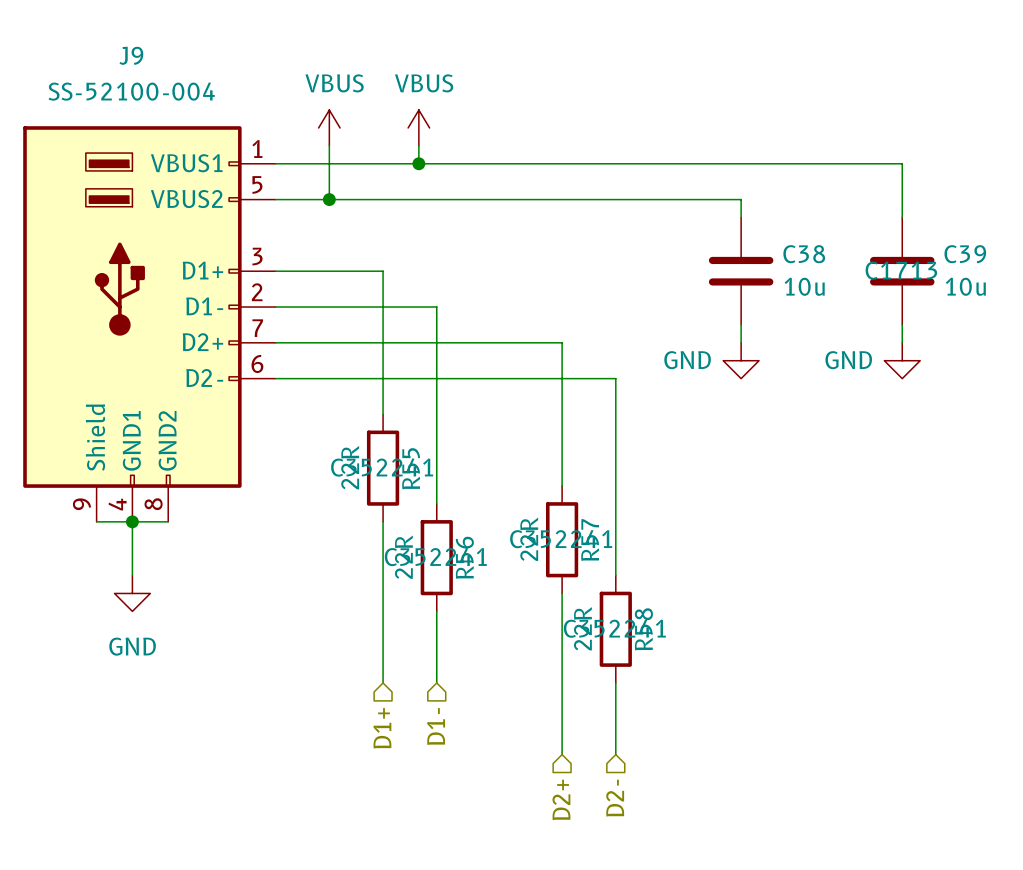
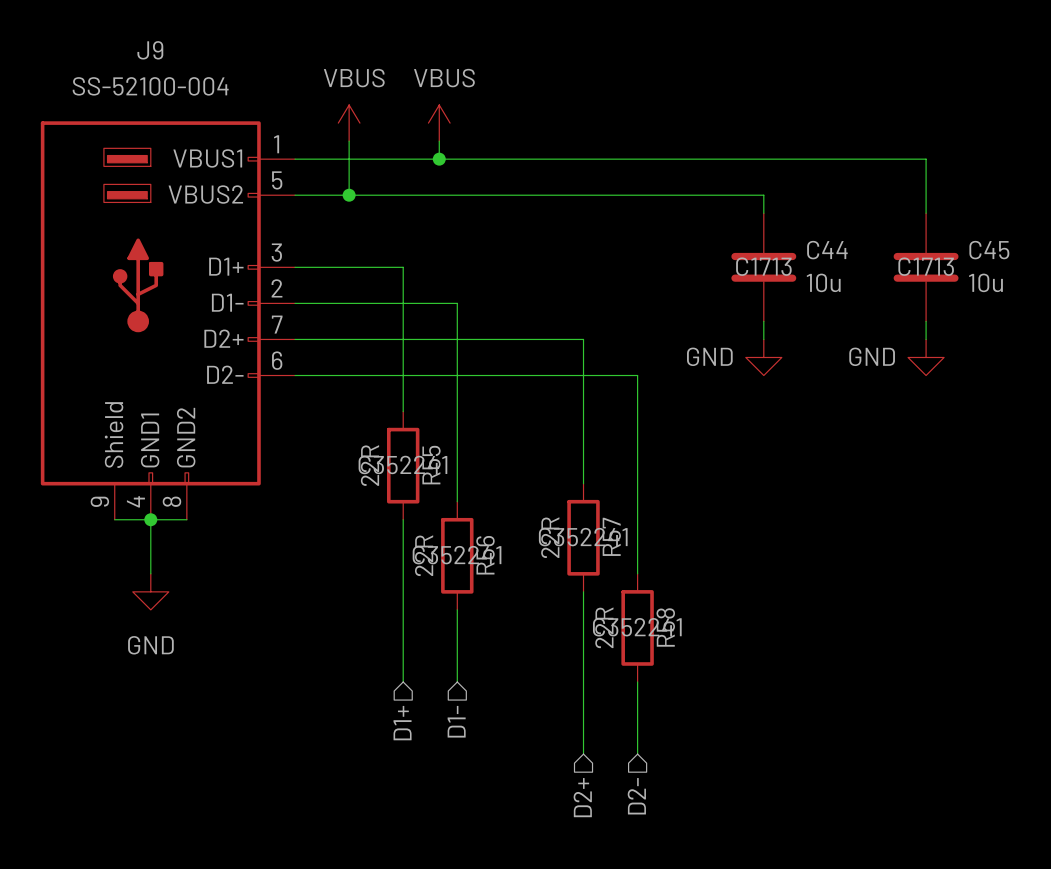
C38 name: C38 (804, 254) -> C44 (827, 250)
C39 name: C39 (965, 254) -> C45 (989, 250)
C38 text: none -> C1713 (763, 266)

